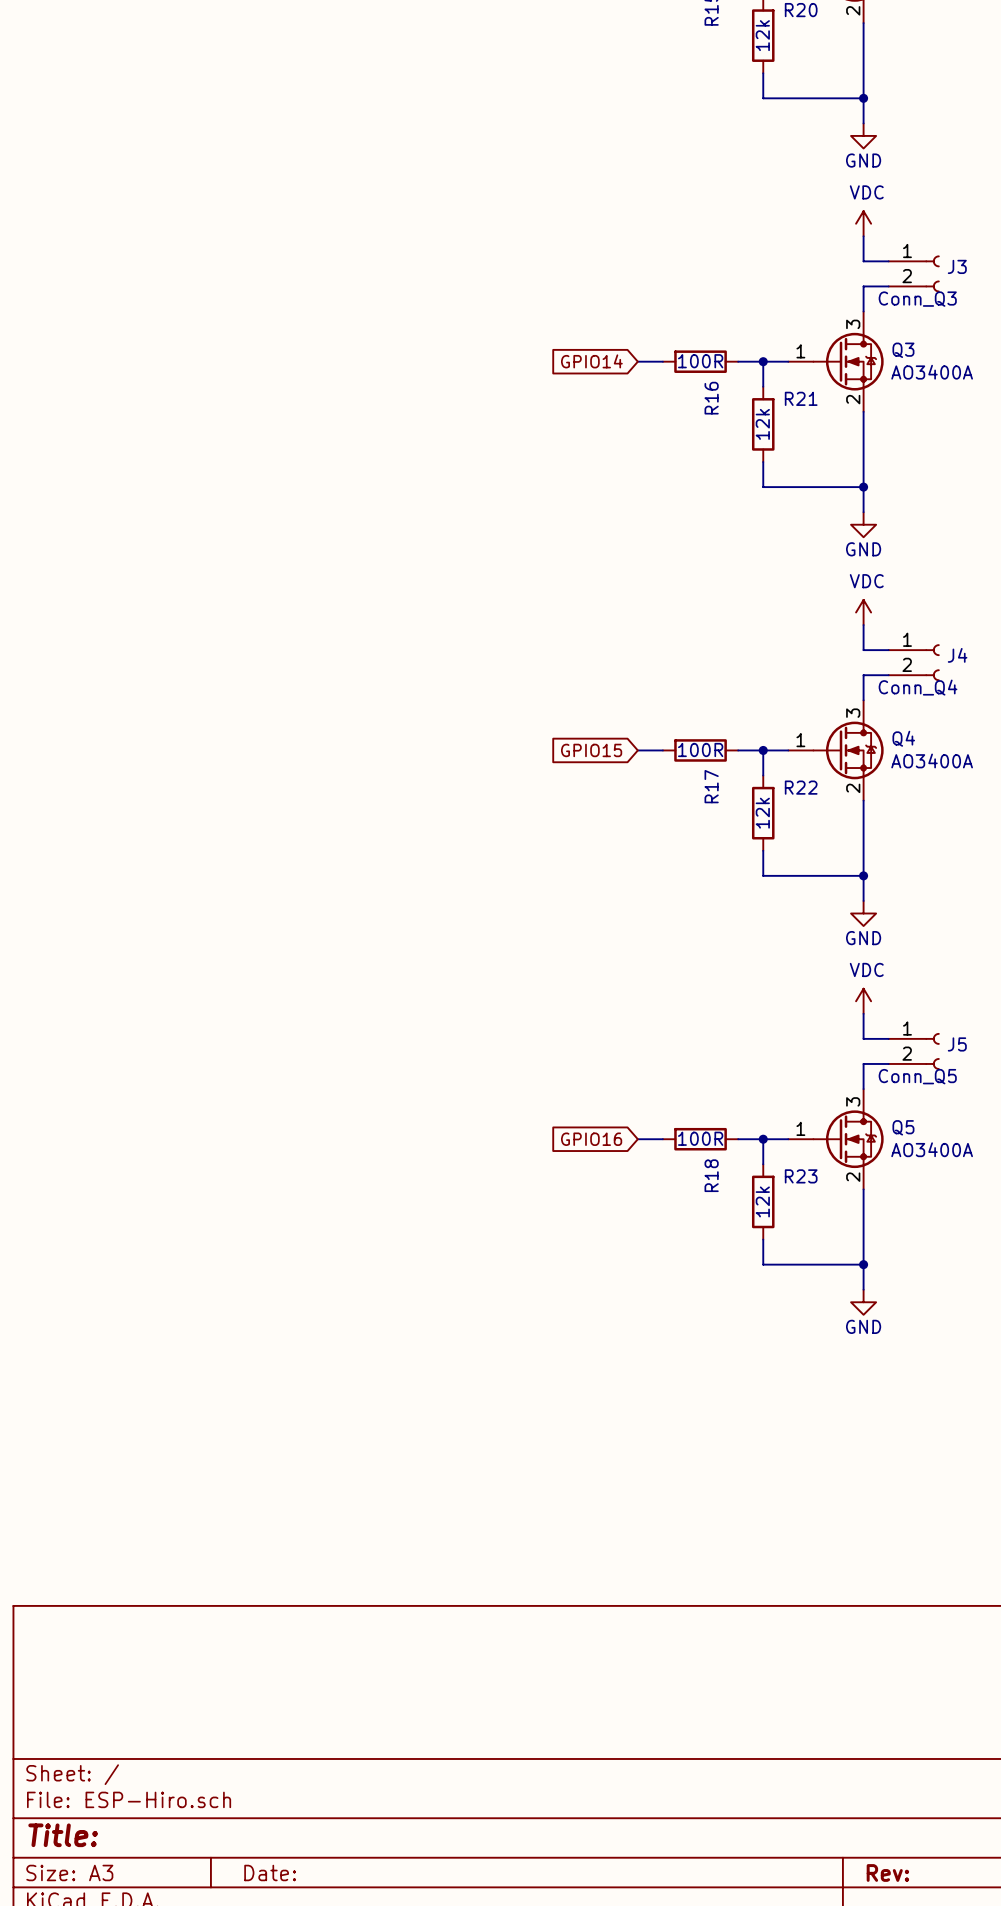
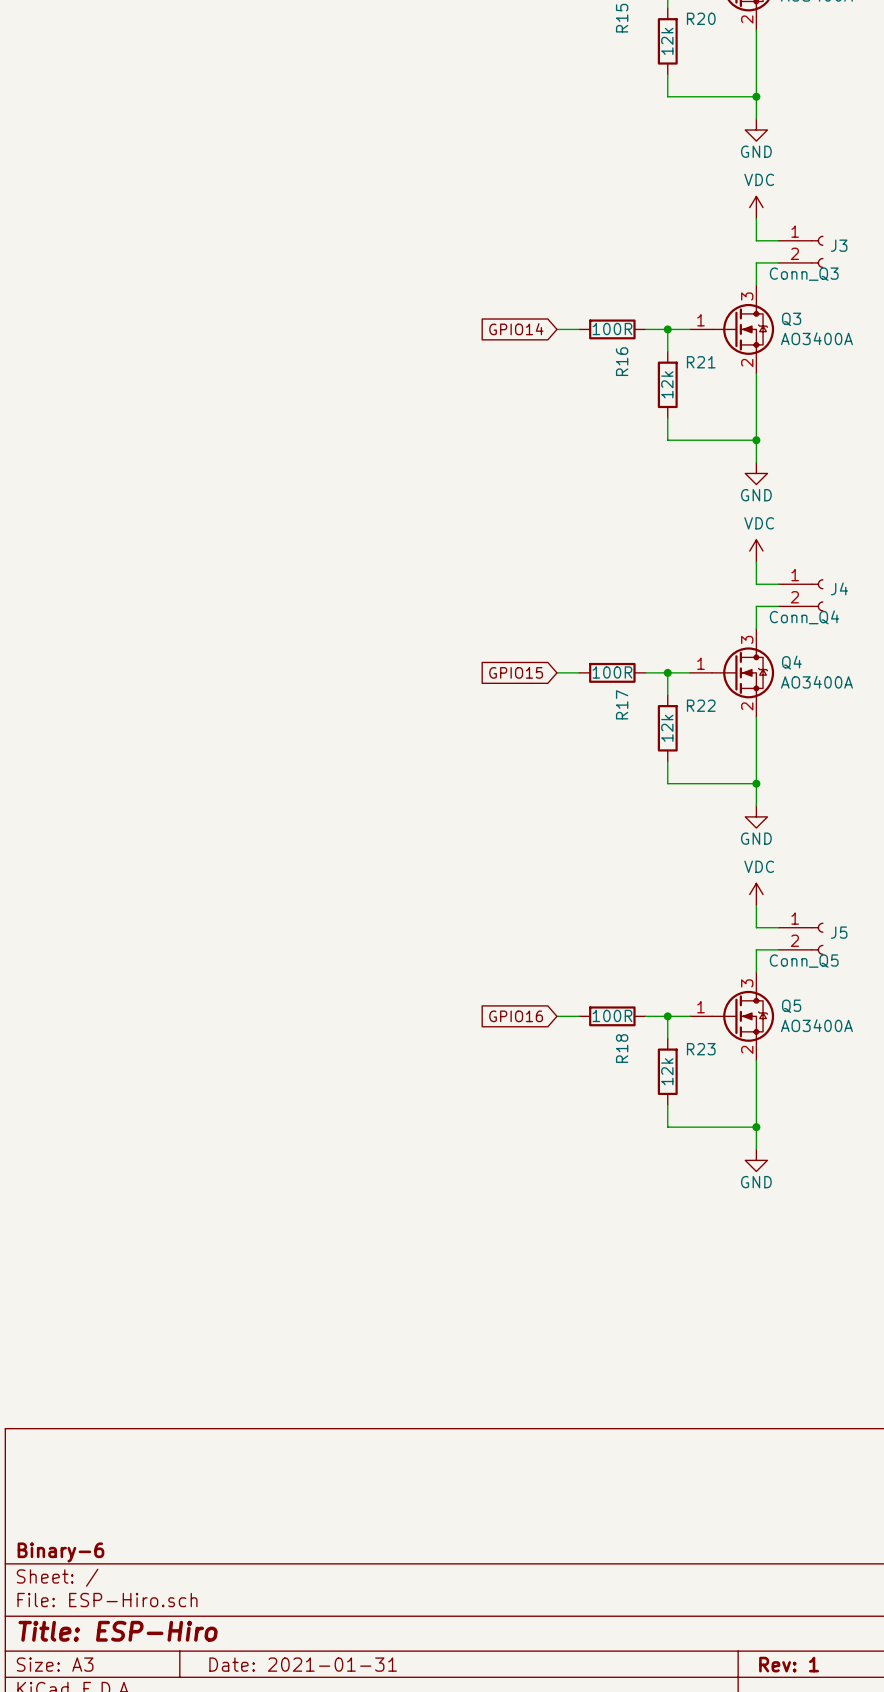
title block: none -> Binary-6 (60, 1552)
title block: Title: (63, 1835) -> Title: ESP-Hiro (118, 1631)
title block: Date: (270, 1872) -> Date: 2021-01-31 (303, 1664)
title block: Rev: (887, 1872) -> Rev: 1 (789, 1664)

